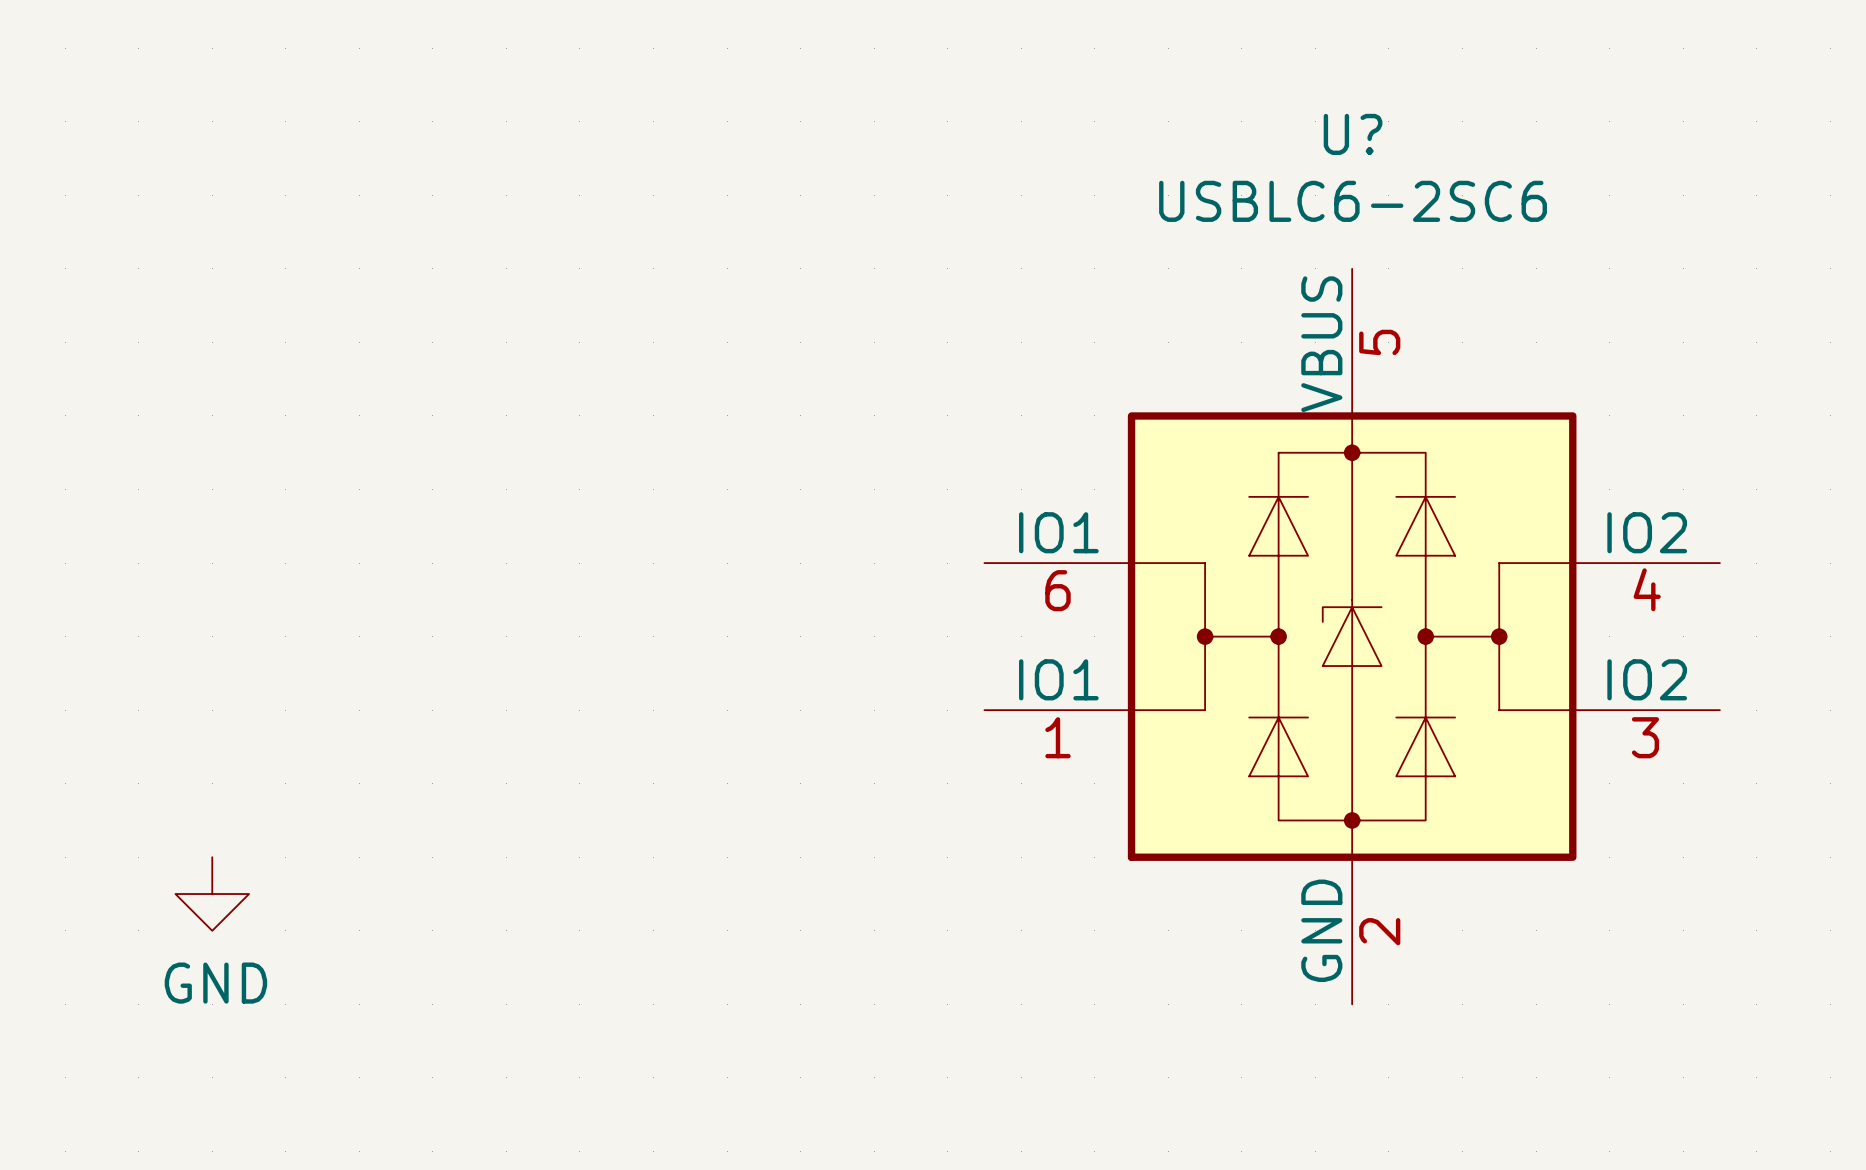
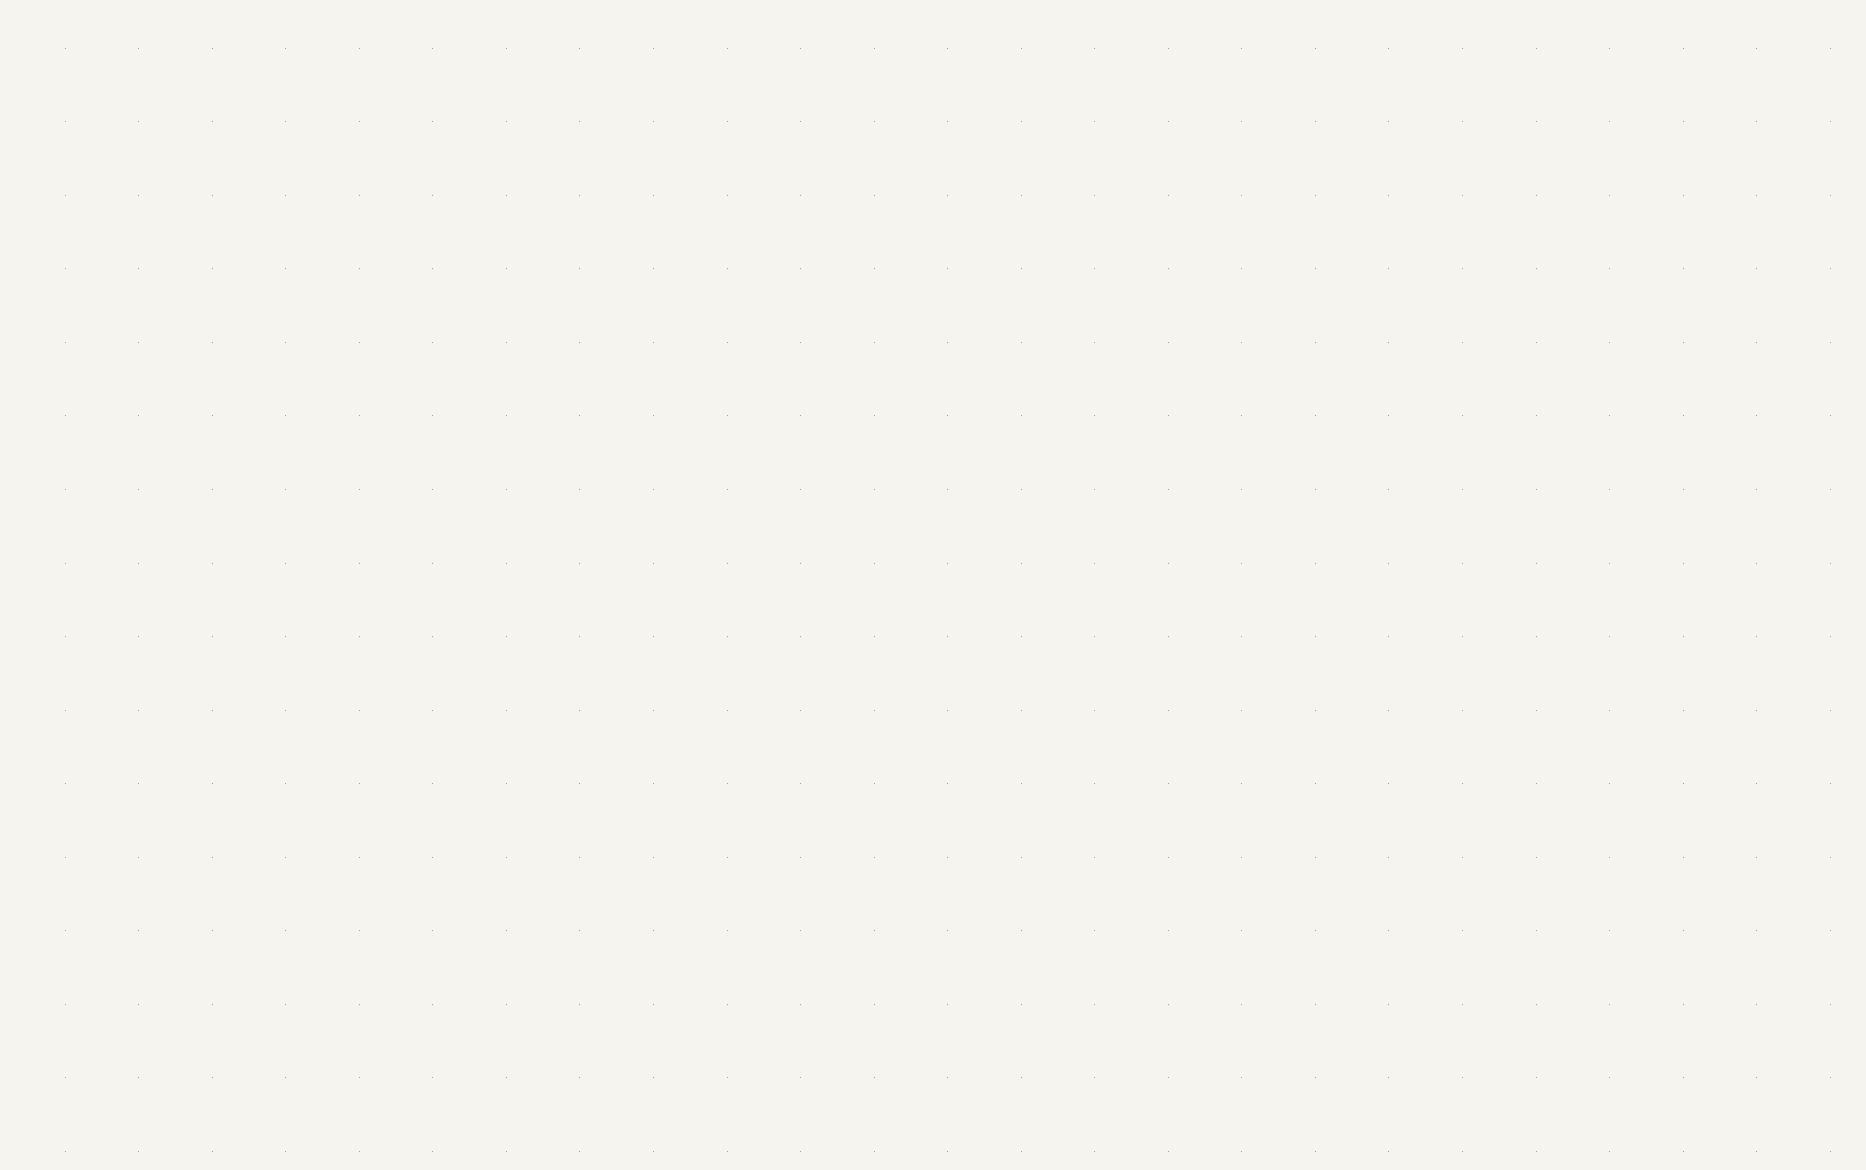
U?: USBLC6-2SC6 (1352, 636) -> none
power symbol: GND (212, 894) -> none

